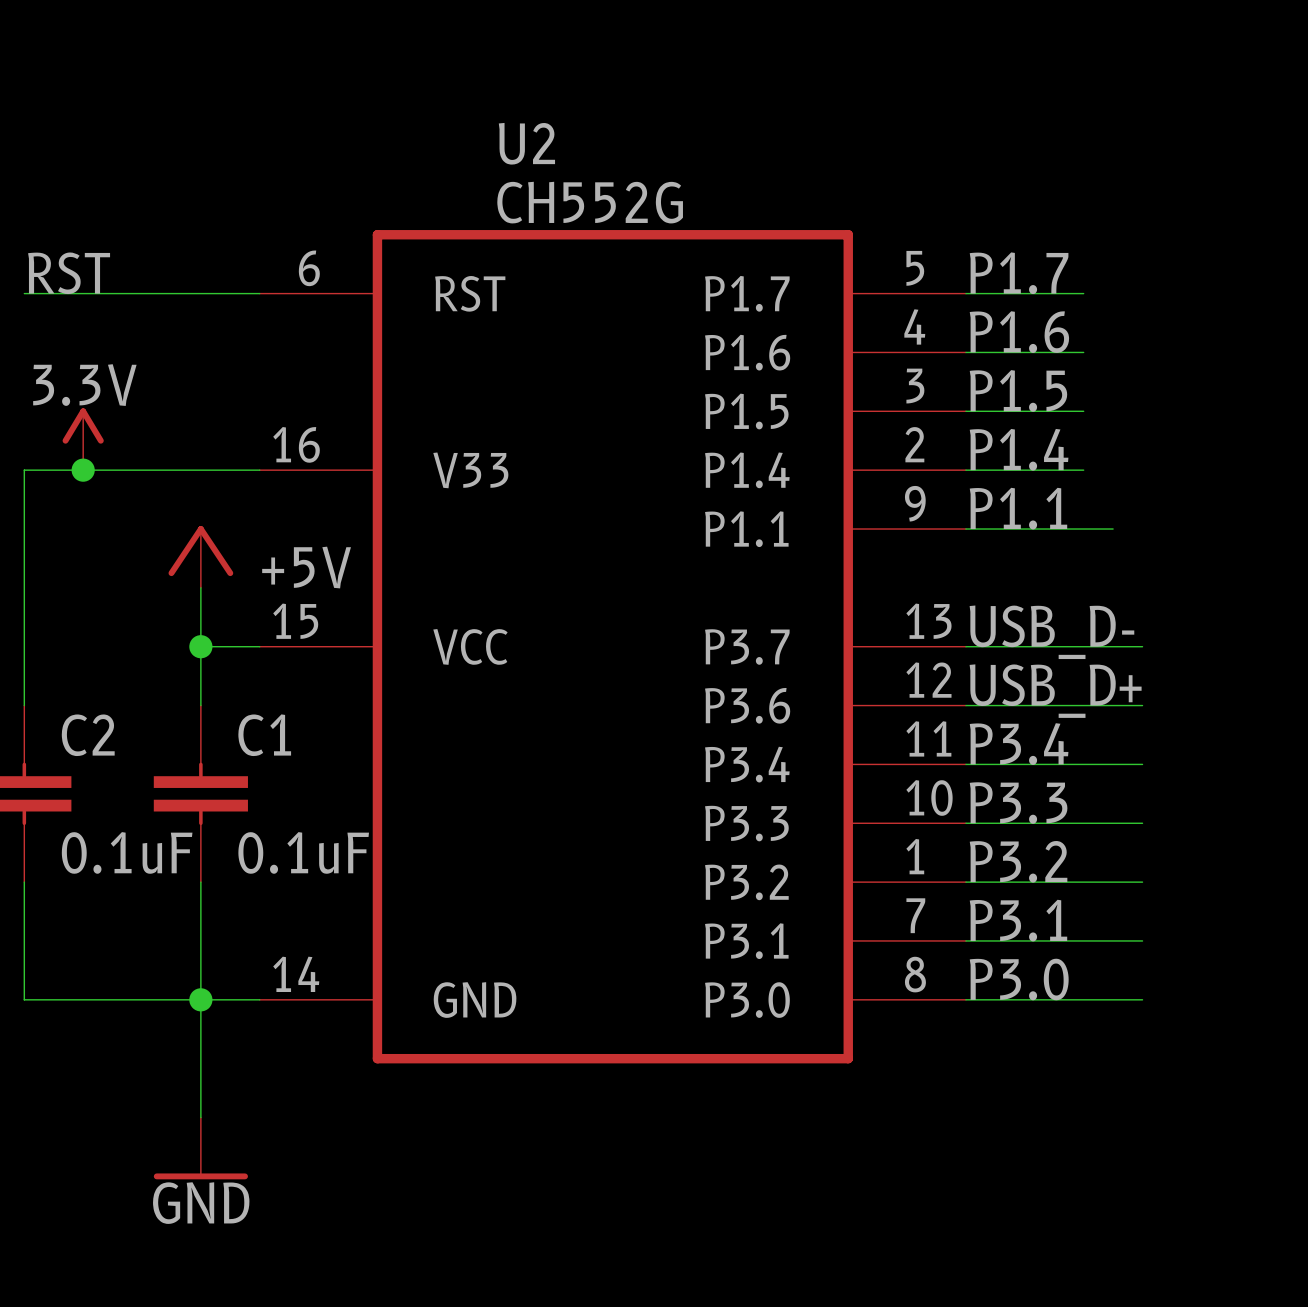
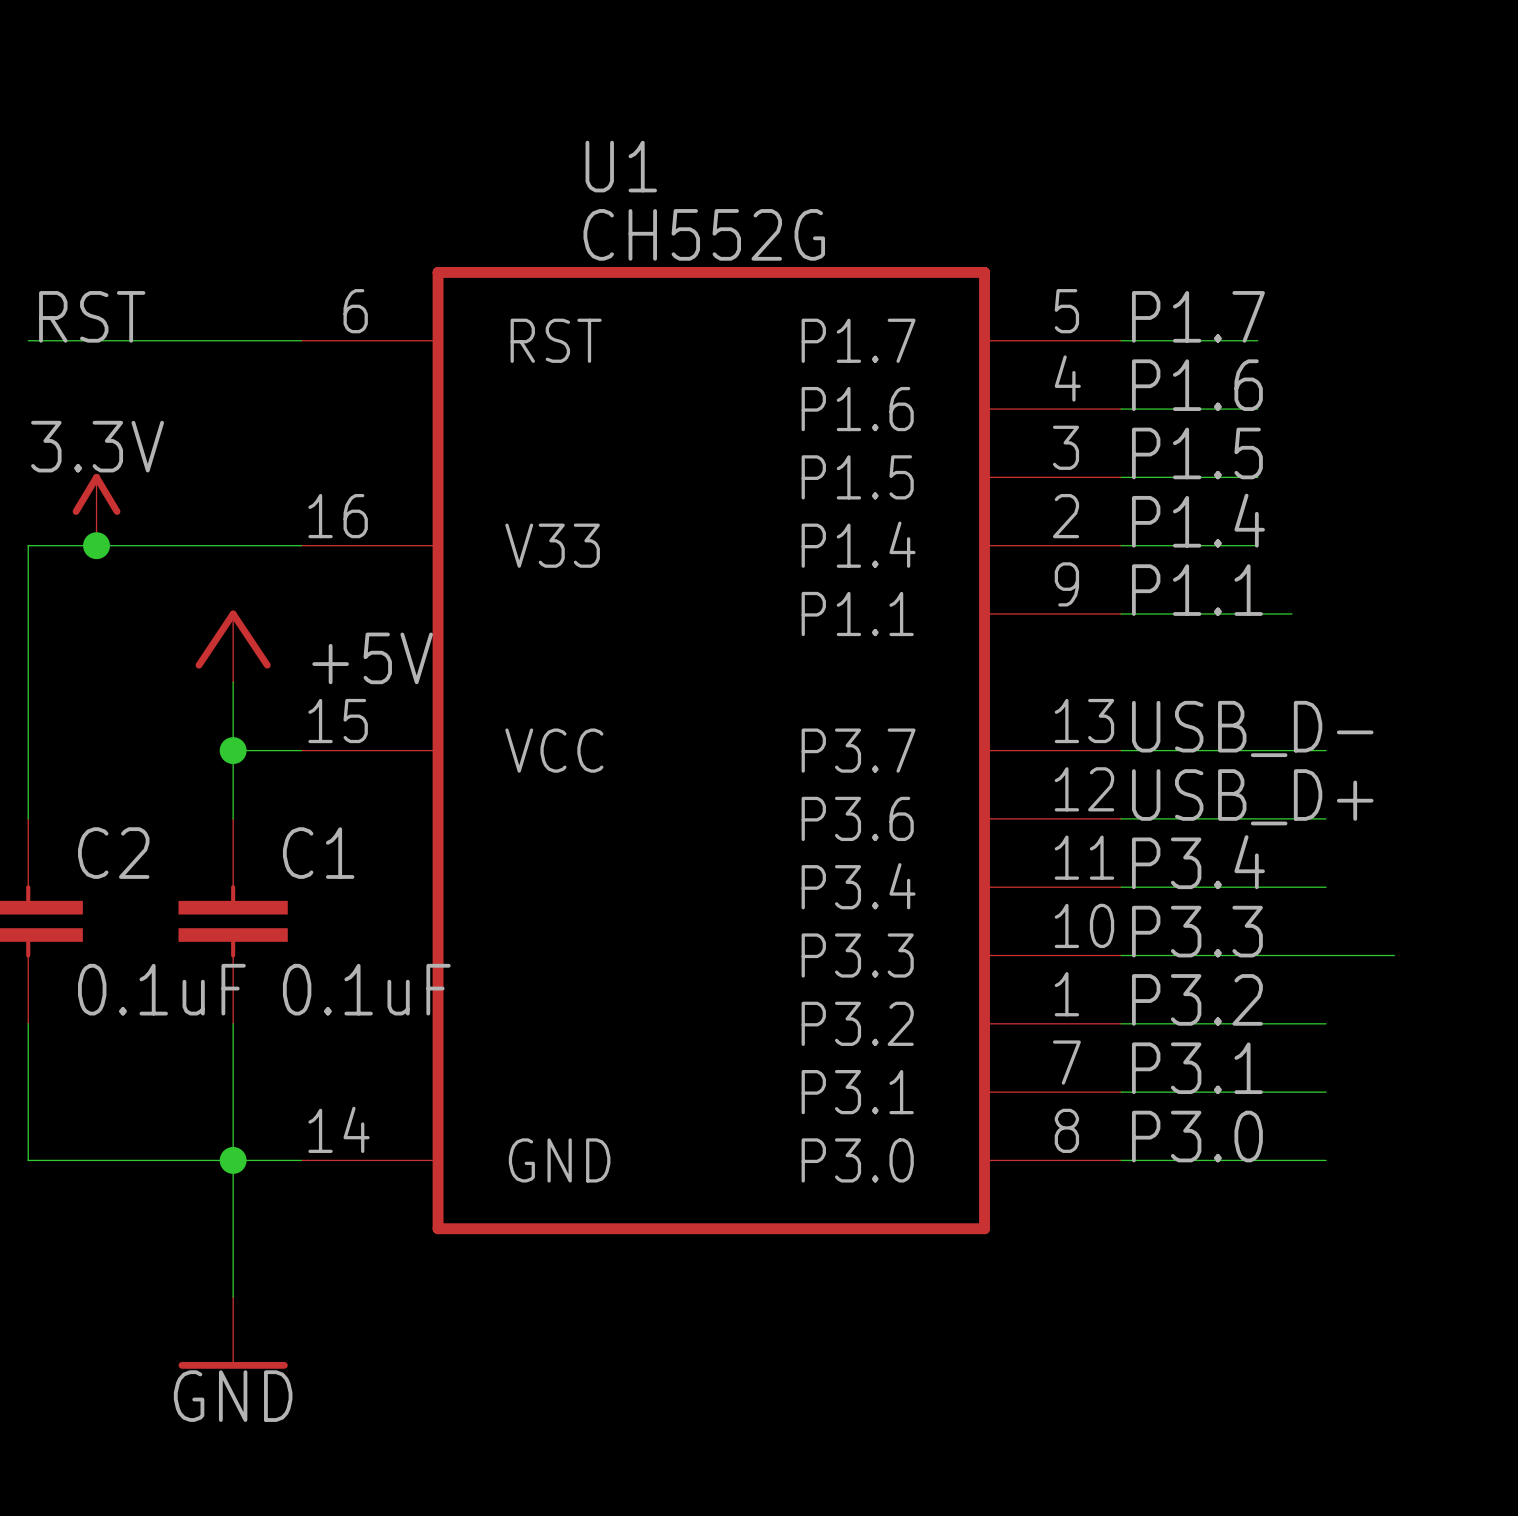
U2 name: U2 (526, 143) -> U1 (621, 166)
wire: none -> (1326, 955) (1394, 955)

